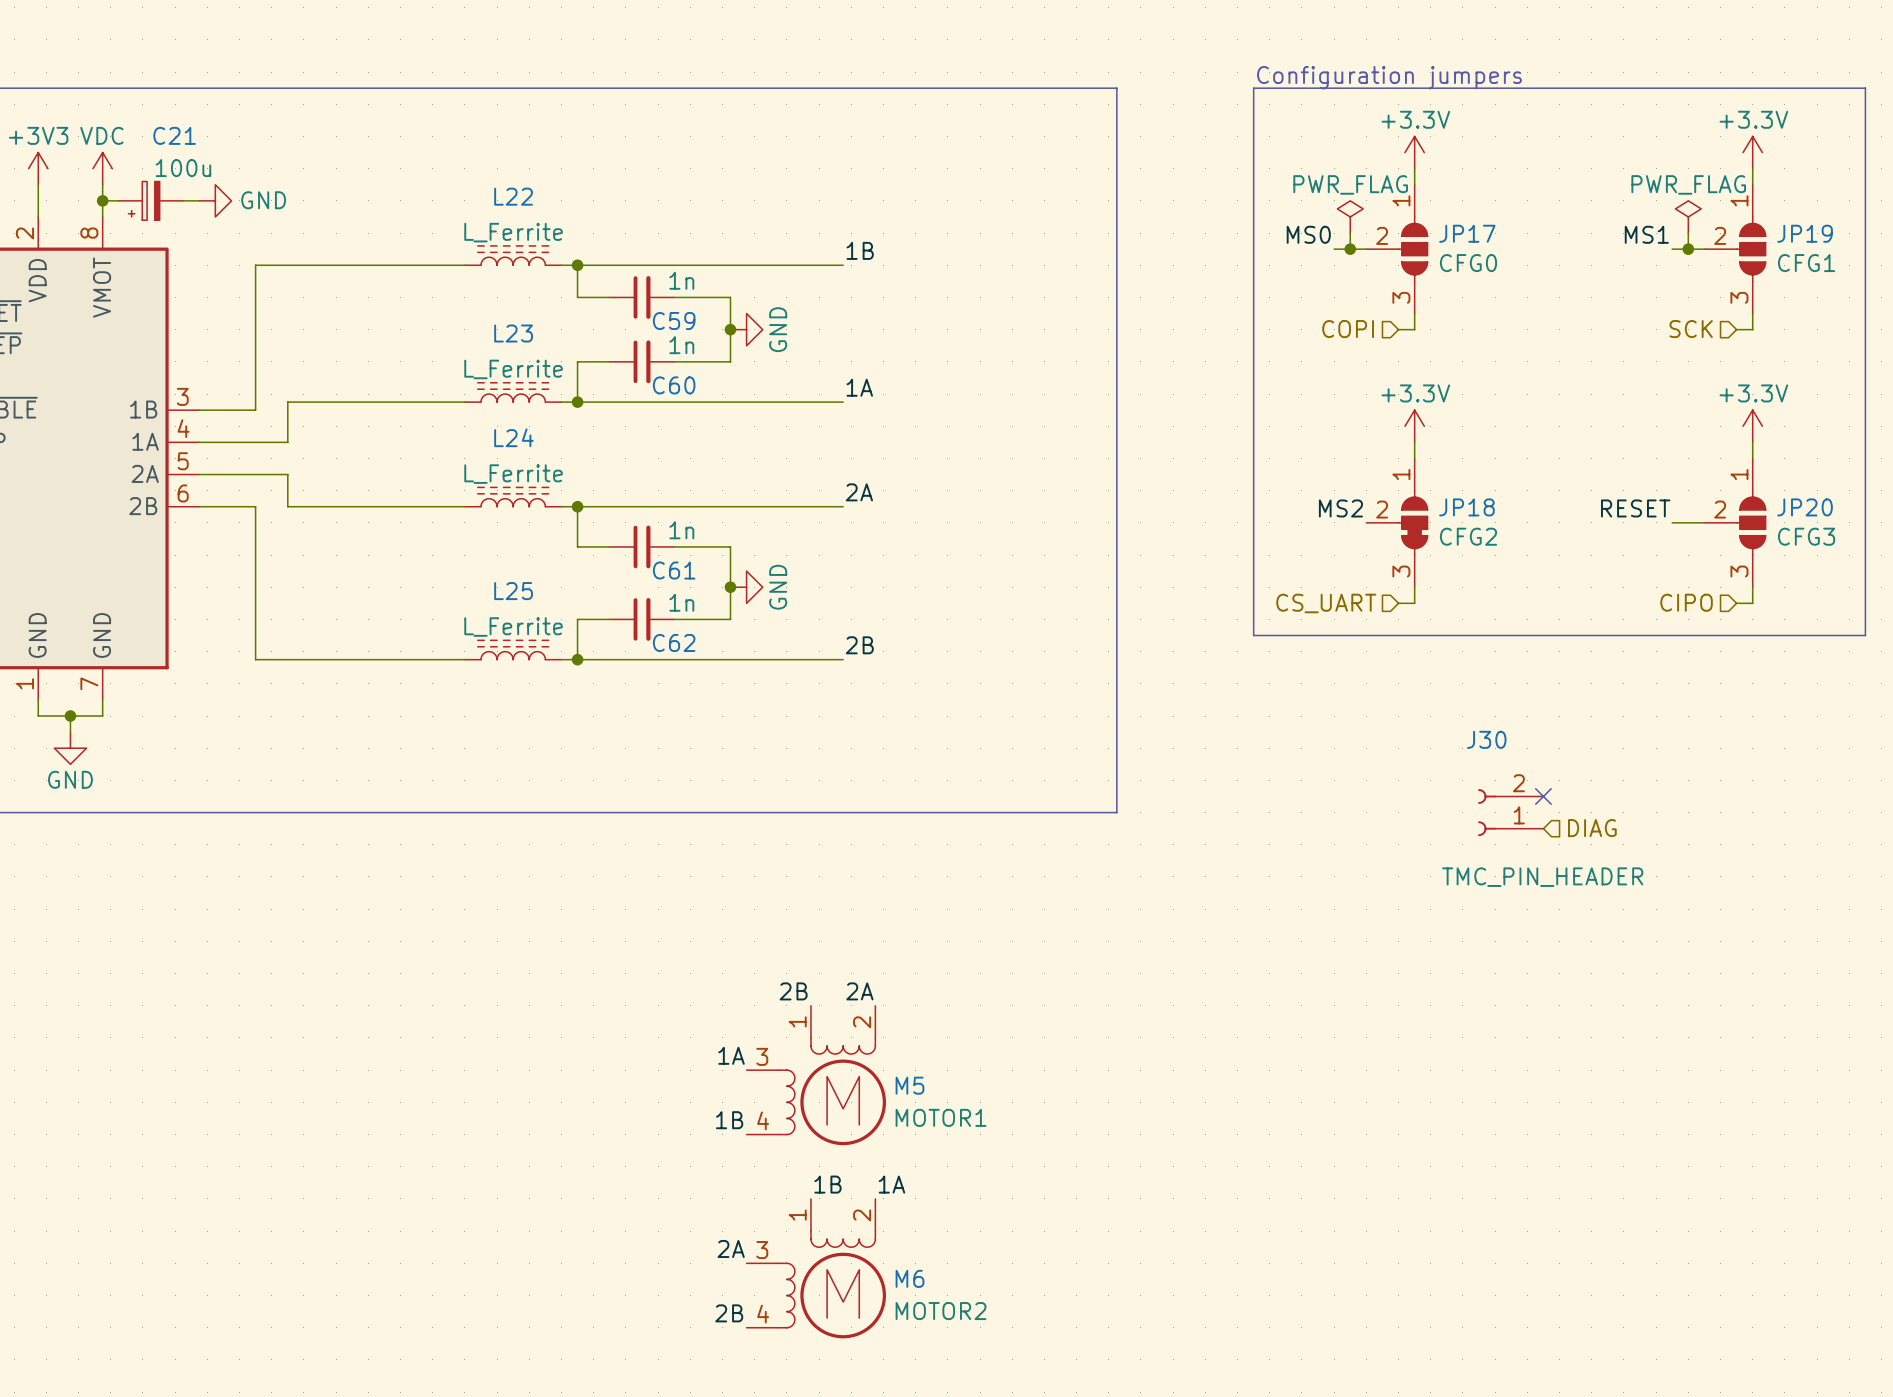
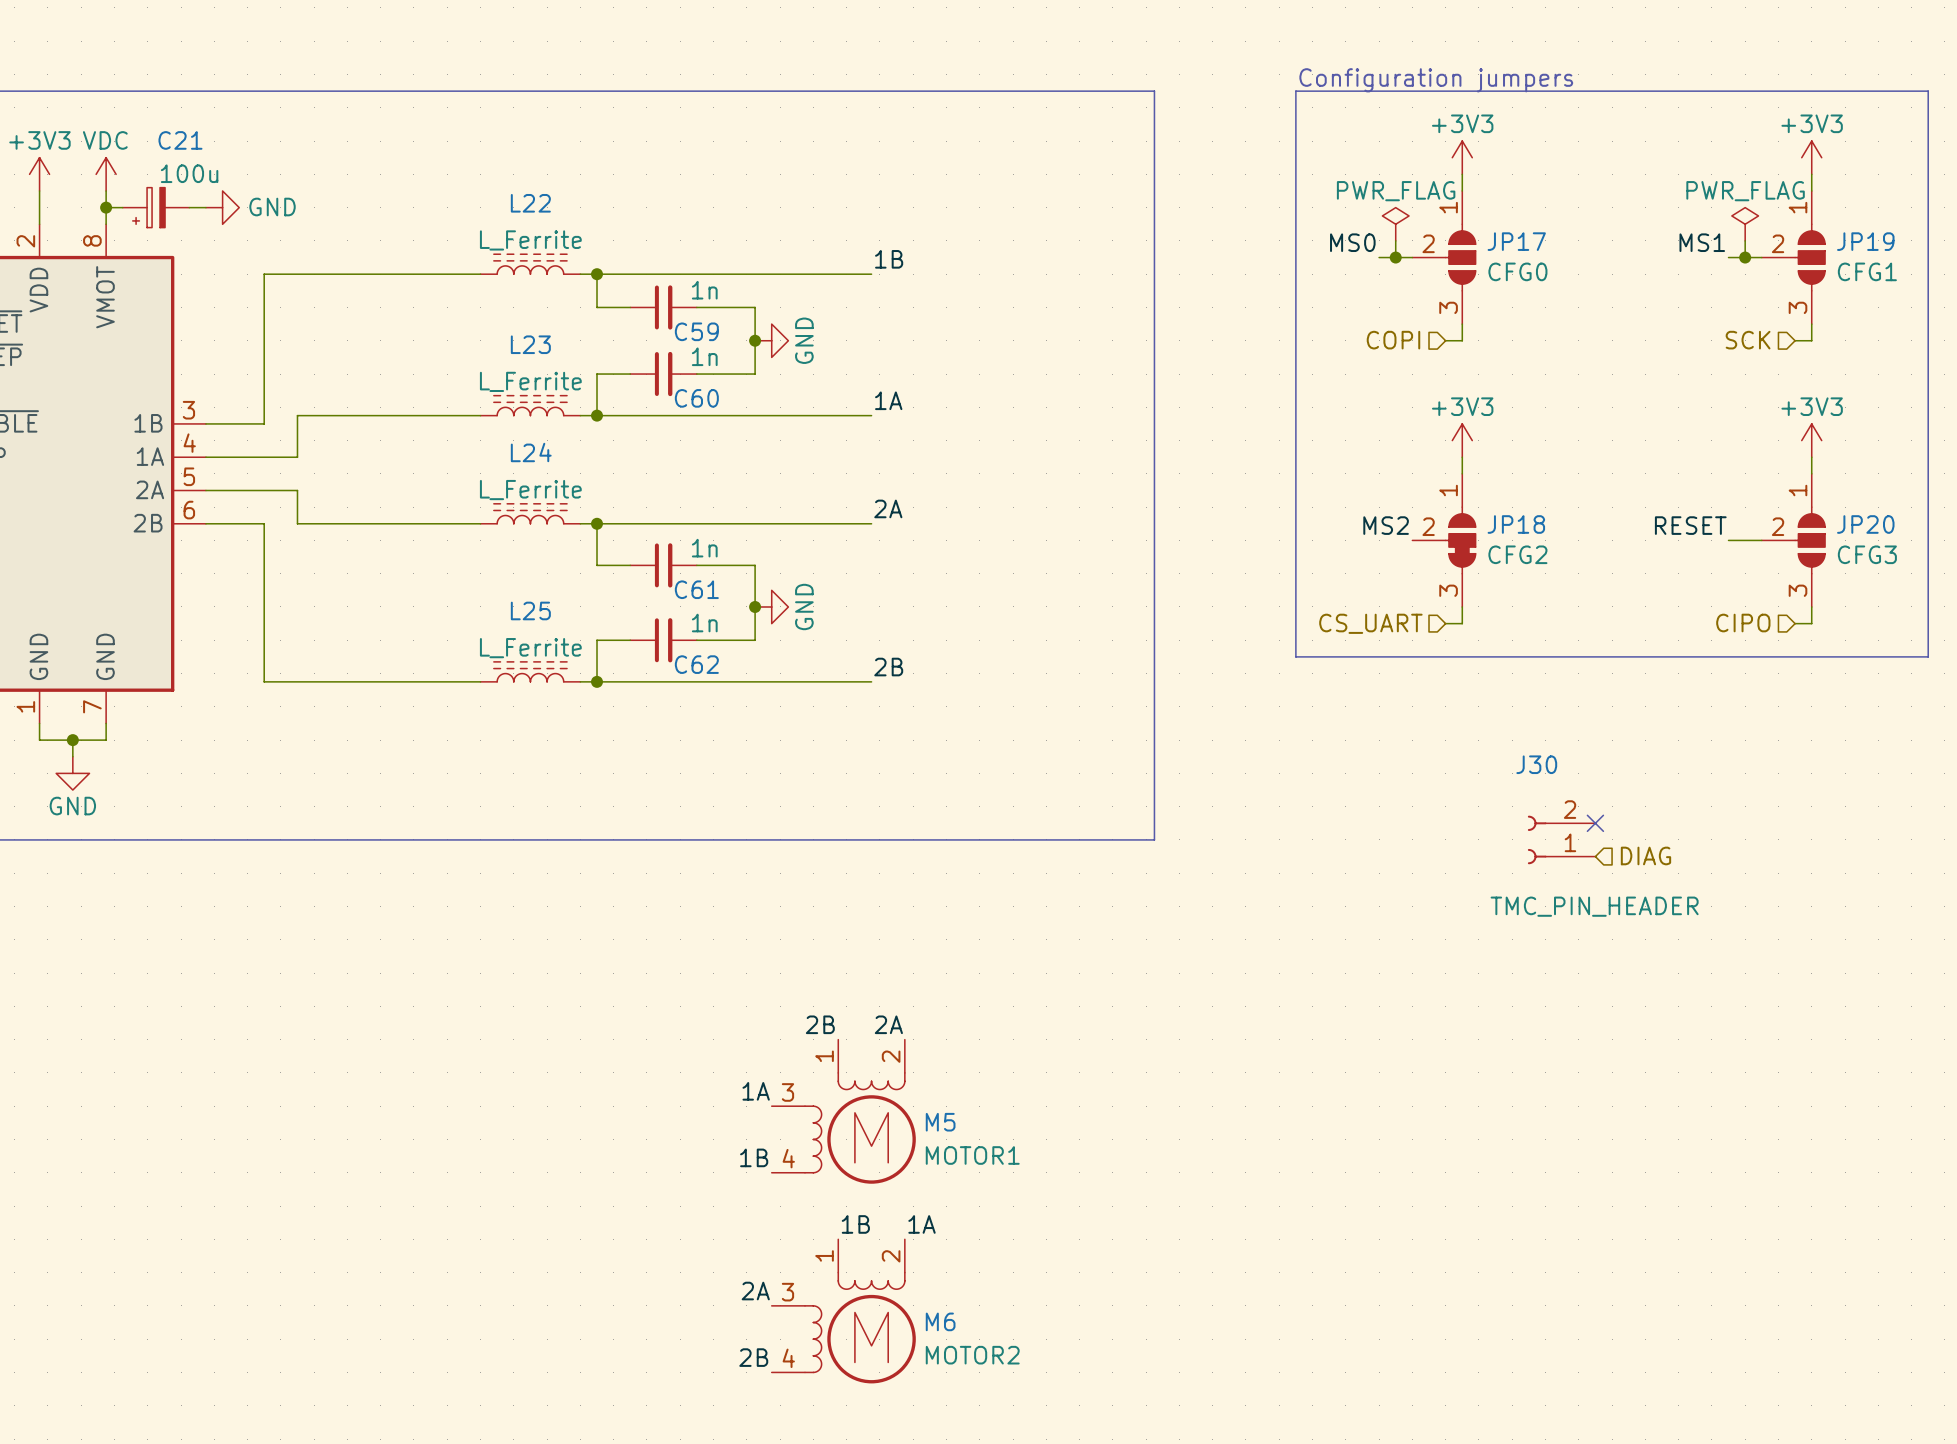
power symbol: +3.3V (1414, 152) -> +3V3 (1462, 157)
power symbol: +3.3V (1752, 152) -> +3V3 (1811, 157)
power symbol: +3.3V (1414, 426) -> +3V3 (1462, 440)
power symbol: +3.3V (1752, 426) -> +3V3 (1811, 440)

